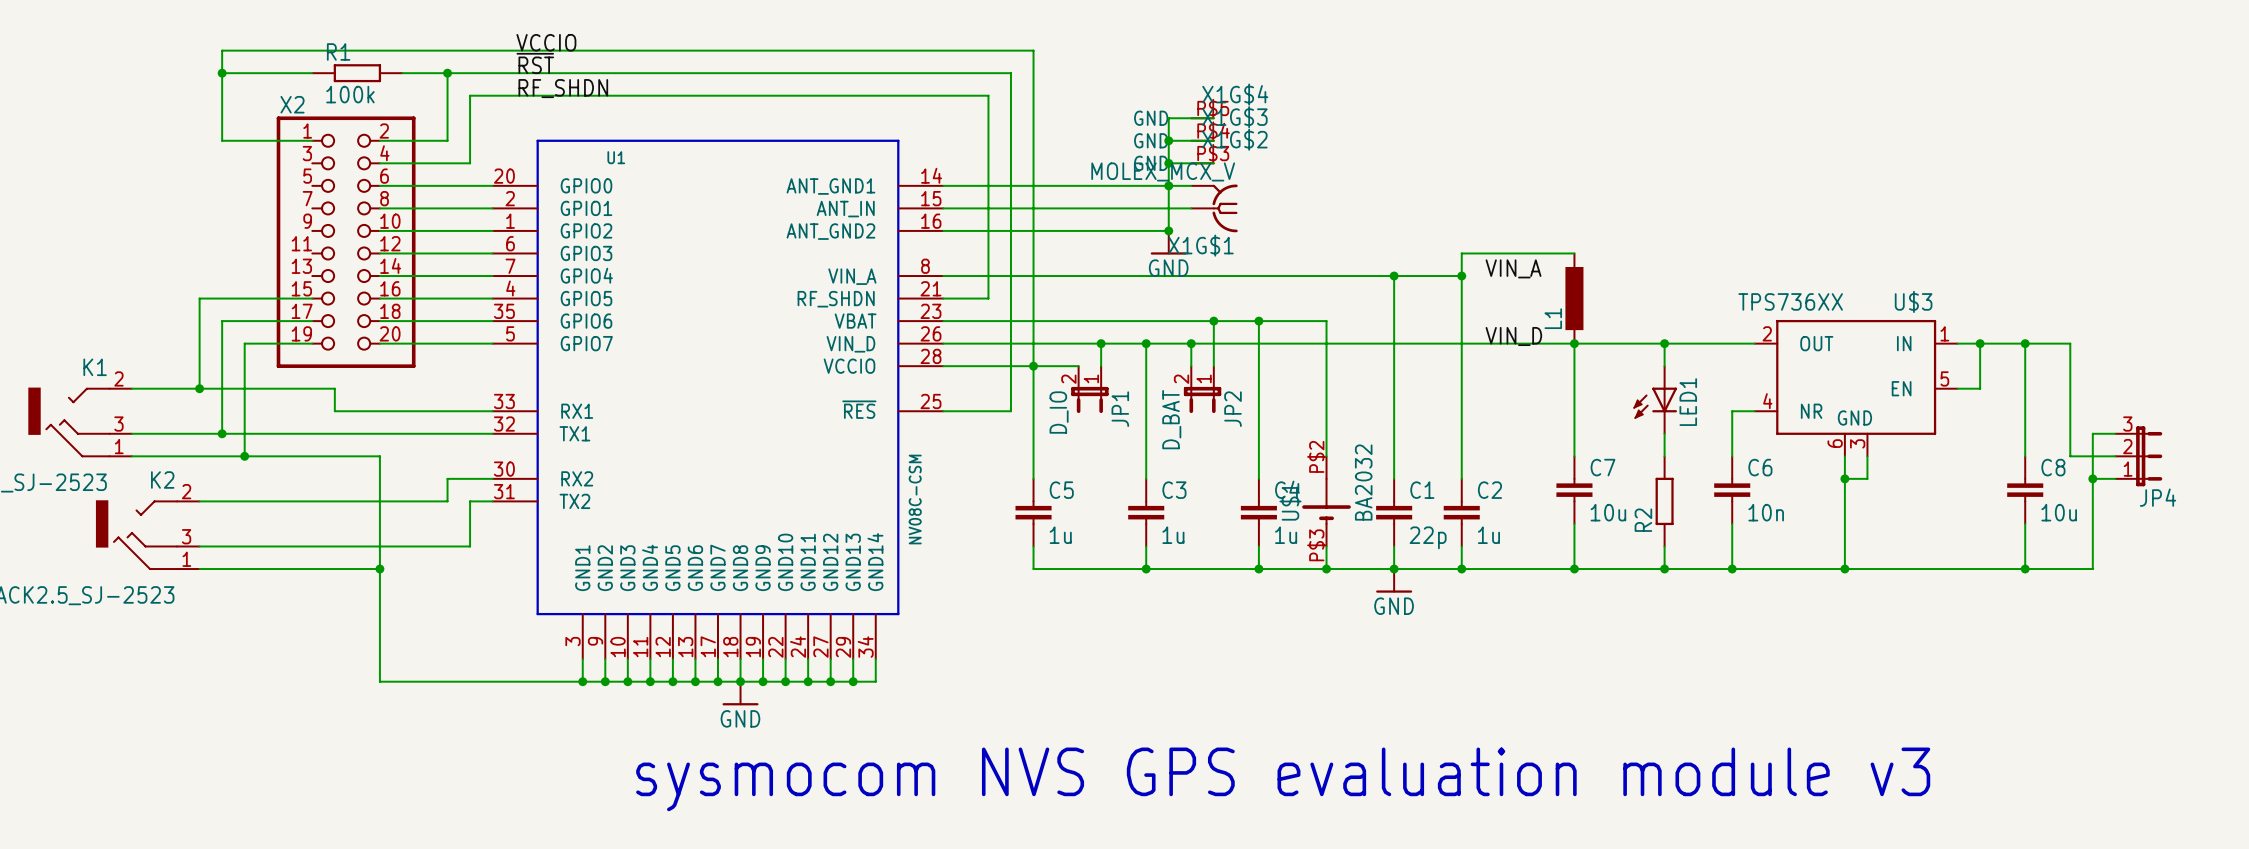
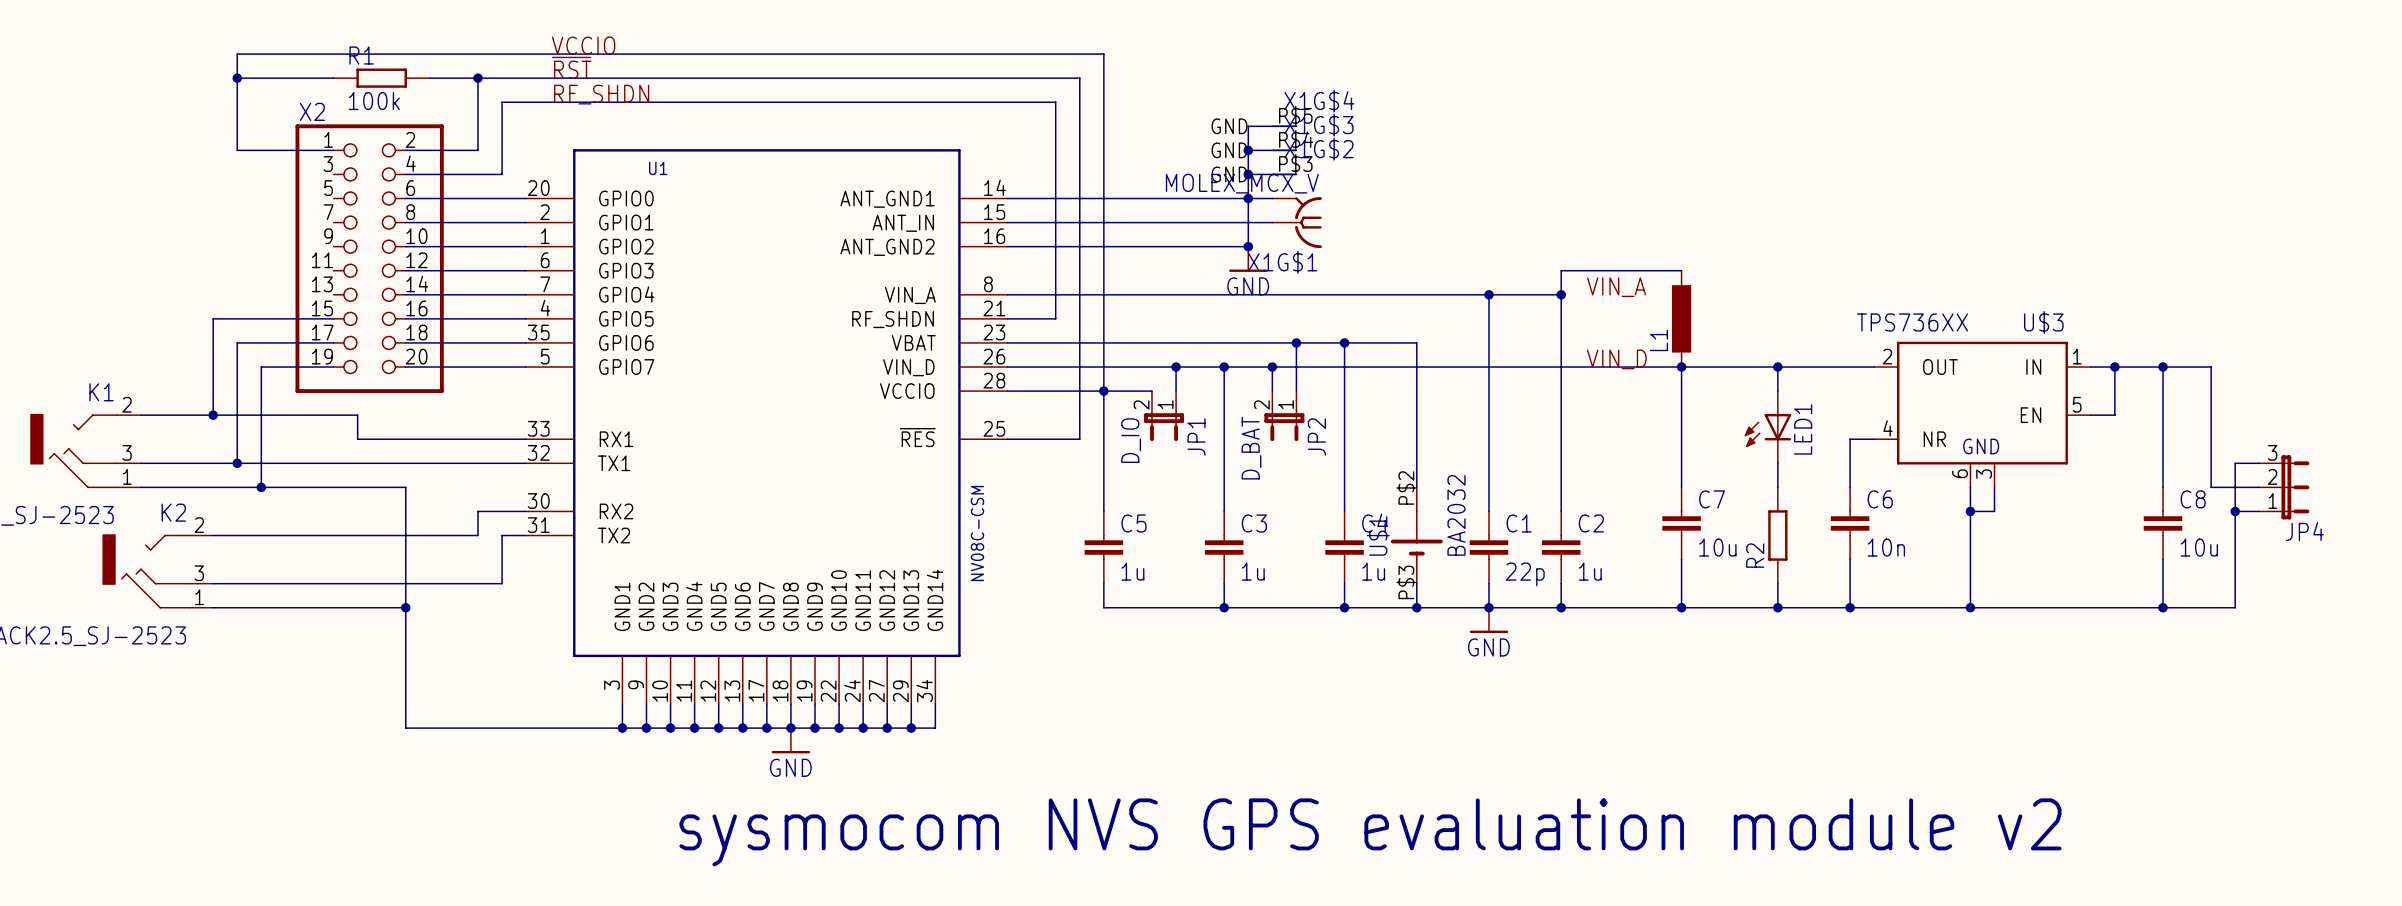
text: sysmocom NVS GPS evaluation module v3 (1283, 779) -> sysmocom NVS GPS evaluation module v2 (1370, 832)

